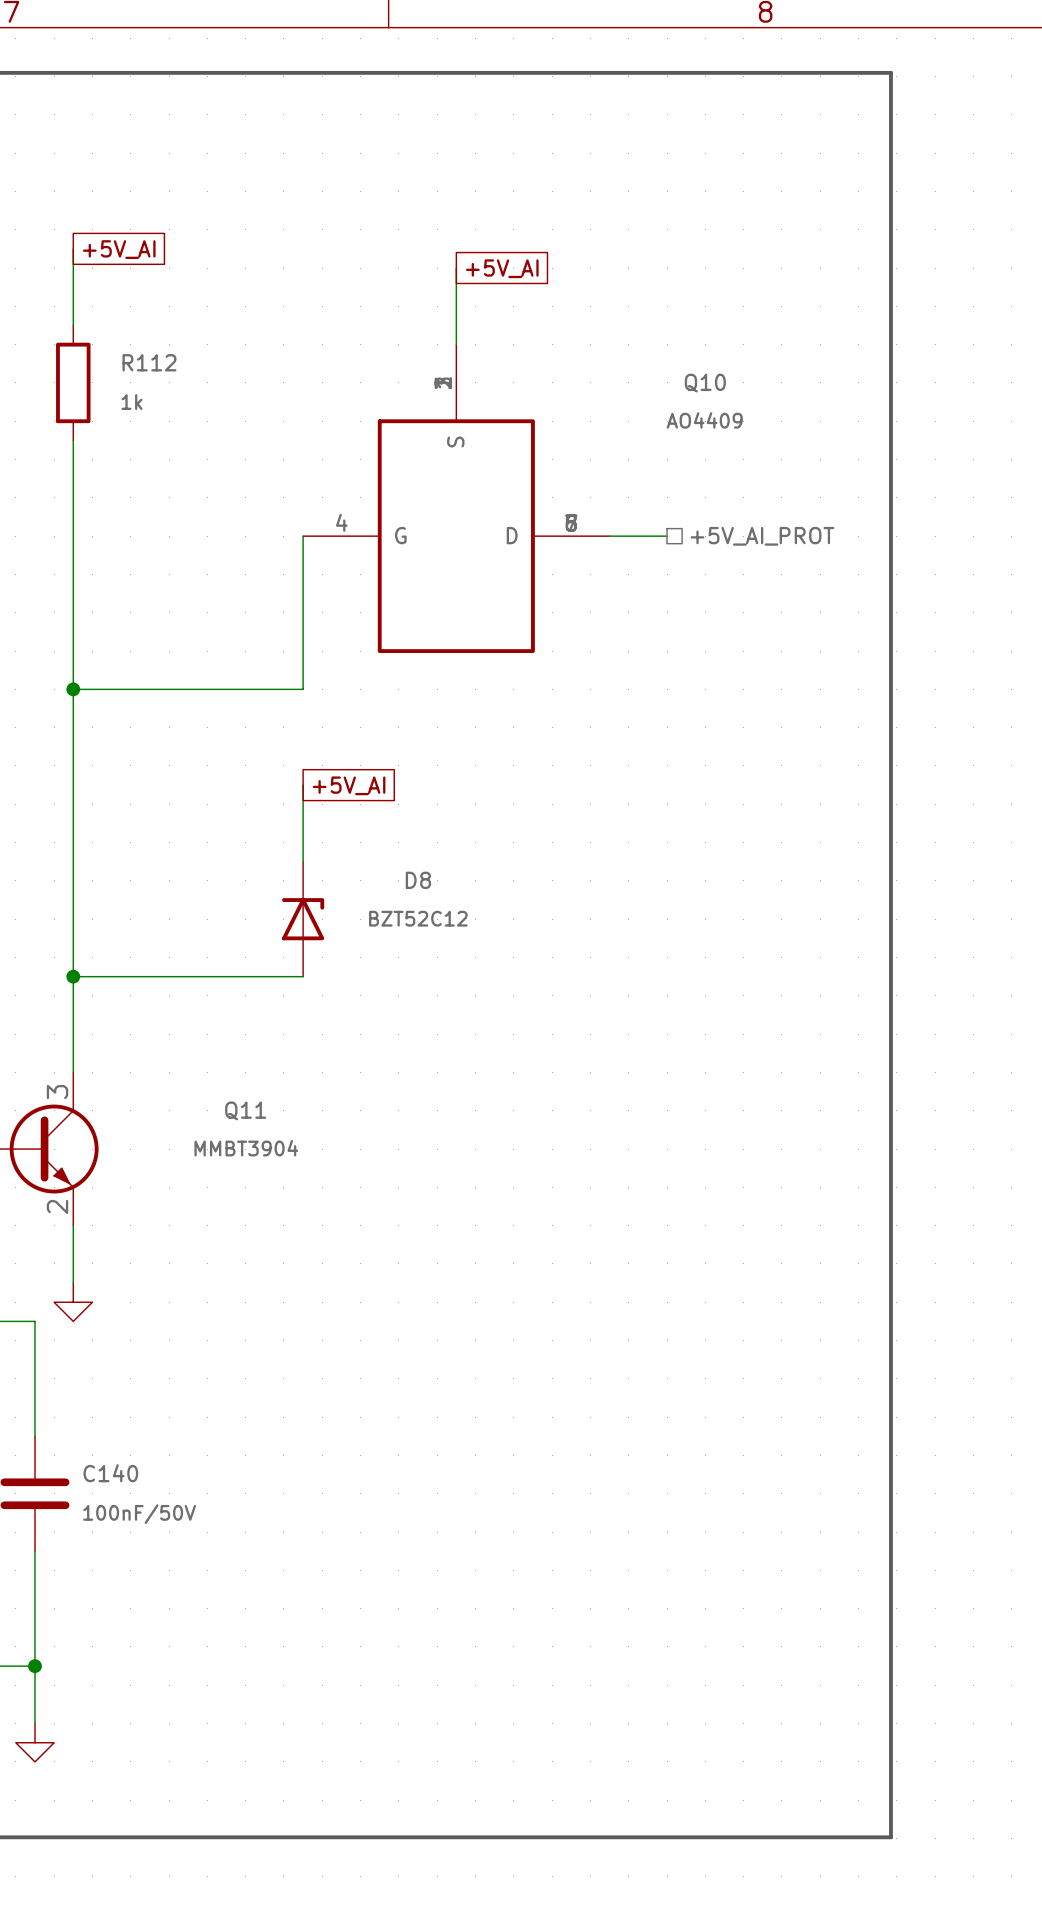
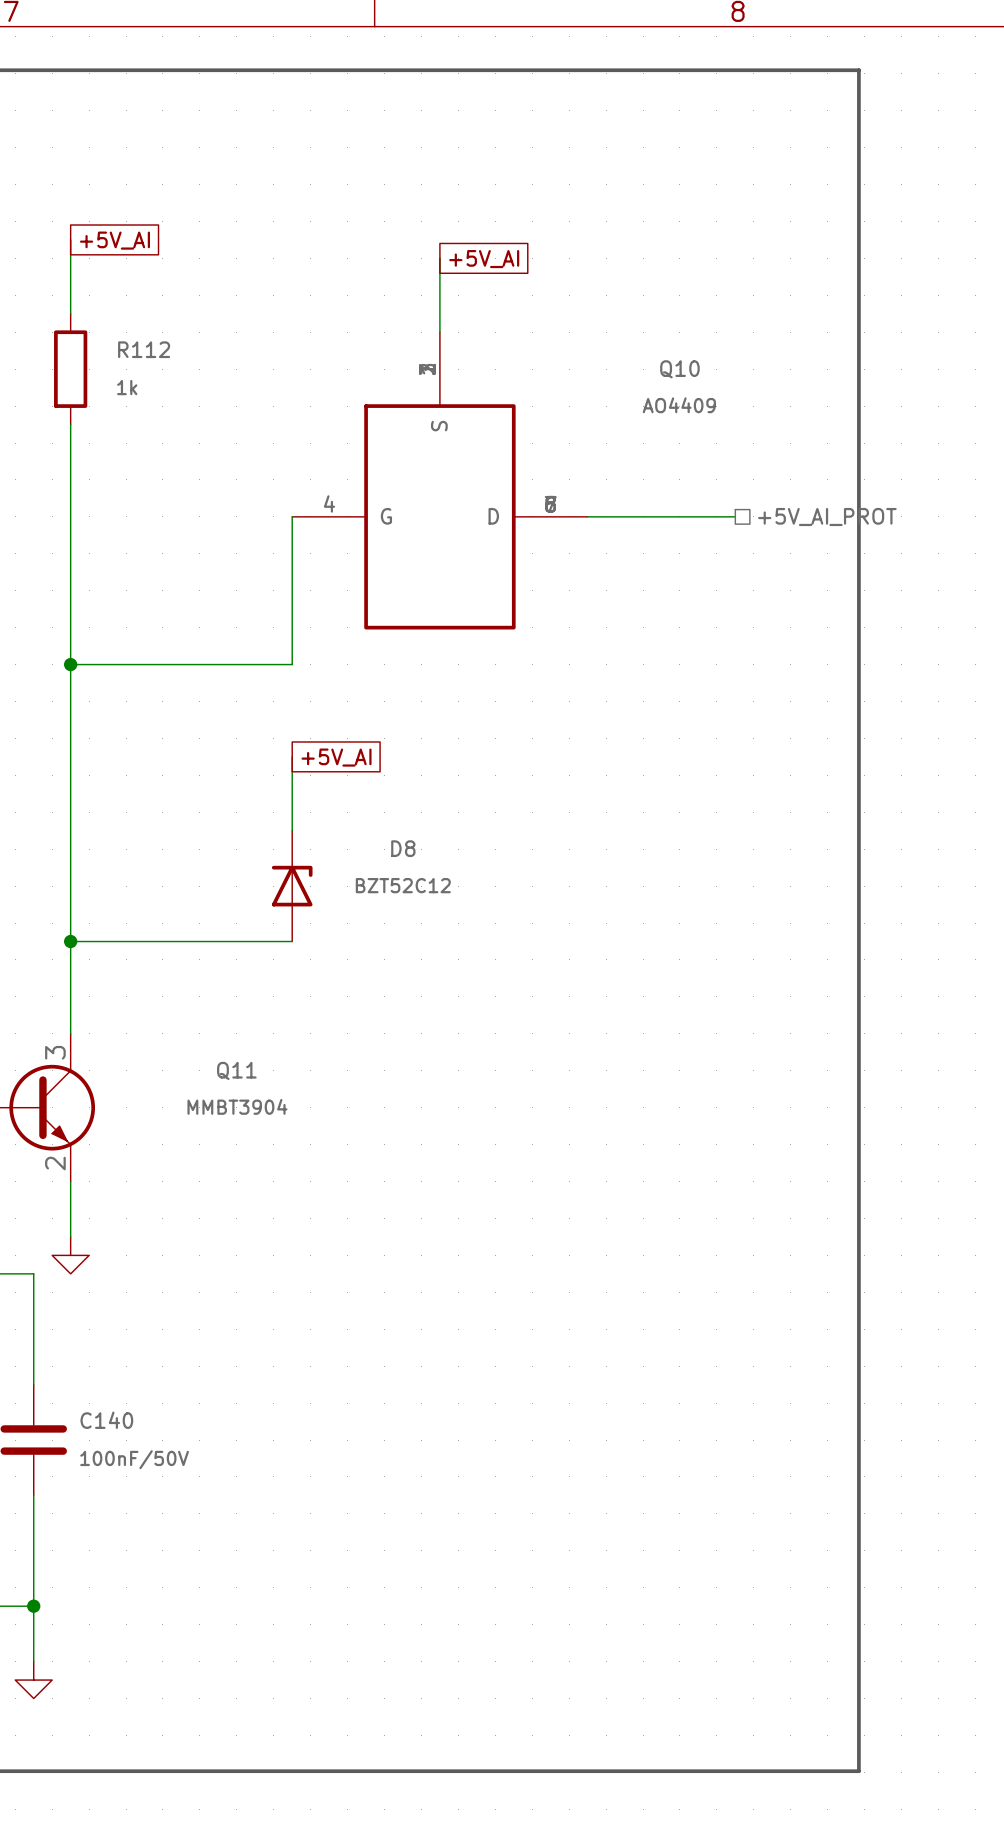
wire: none -> (643, 516) (735, 516)
hierarchical label position: +5V_AI_PROT (762, 536) -> +5V_AI_PROT (827, 517)

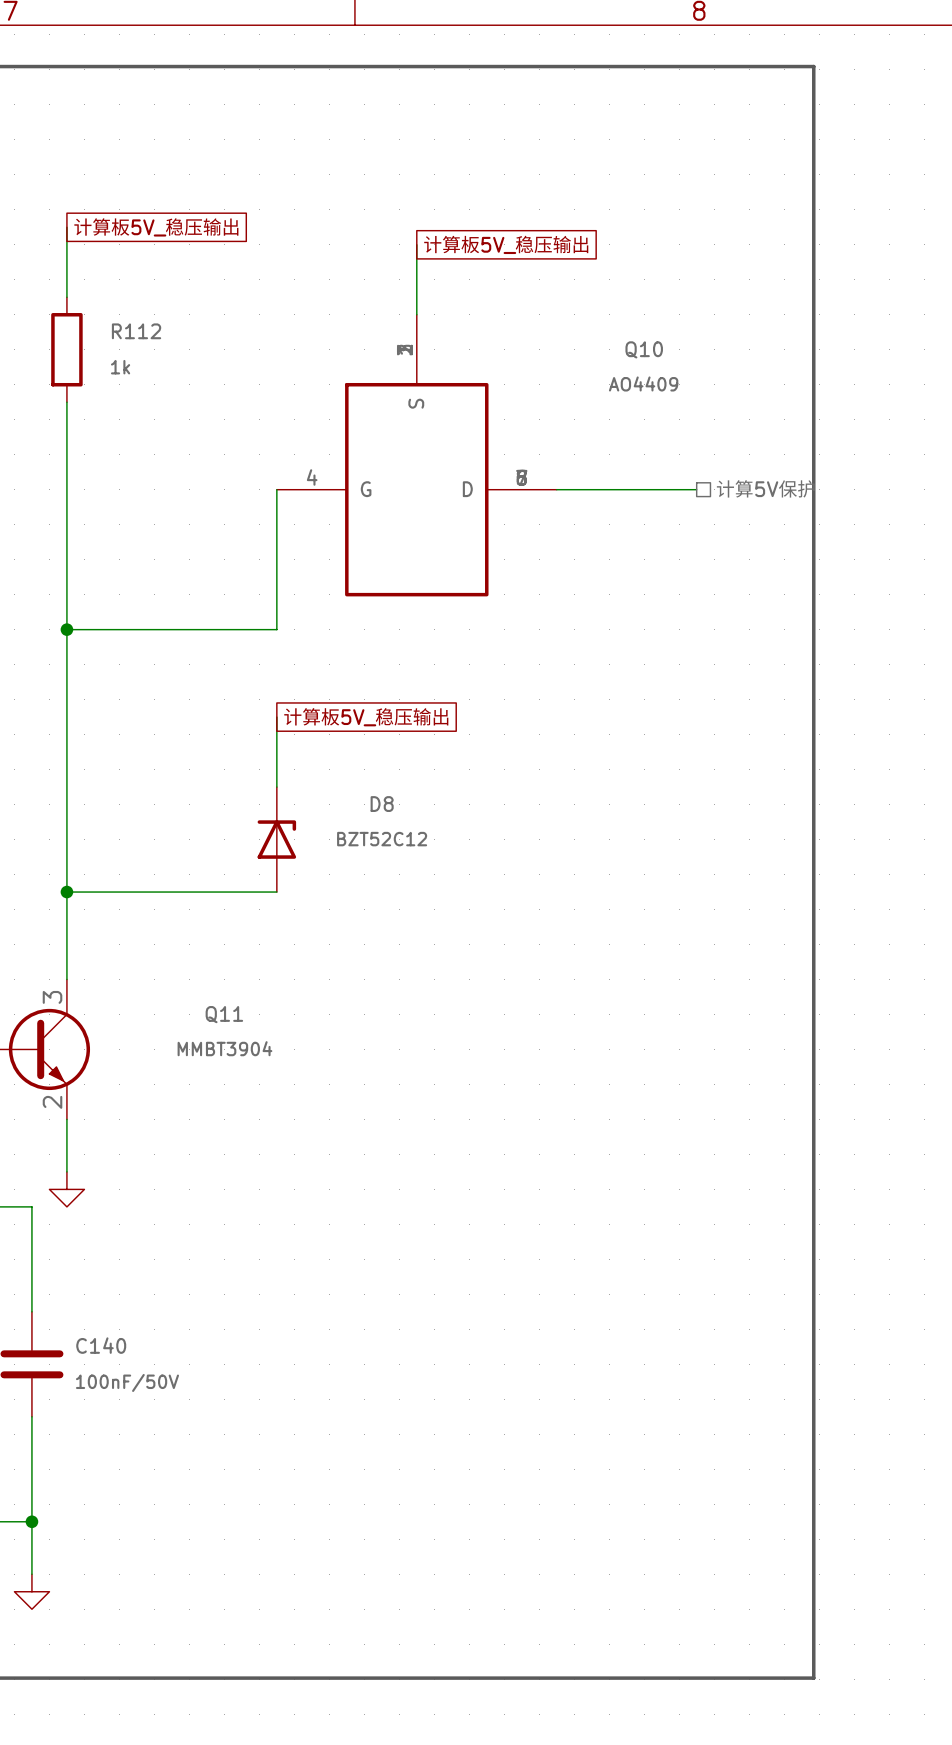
global label: +5V_AI (114, 240) -> 计算板5V_稳压输出 (156, 227)
global label: +5V_AI (484, 259) -> 计算板5V_稳压输出 (506, 244)
hierarchical label: +5V_AI_PROT (827, 517) -> 计算5V保护 (765, 488)
global label: +5V_AI (336, 757) -> 计算板5V_稳压输出 (366, 716)

